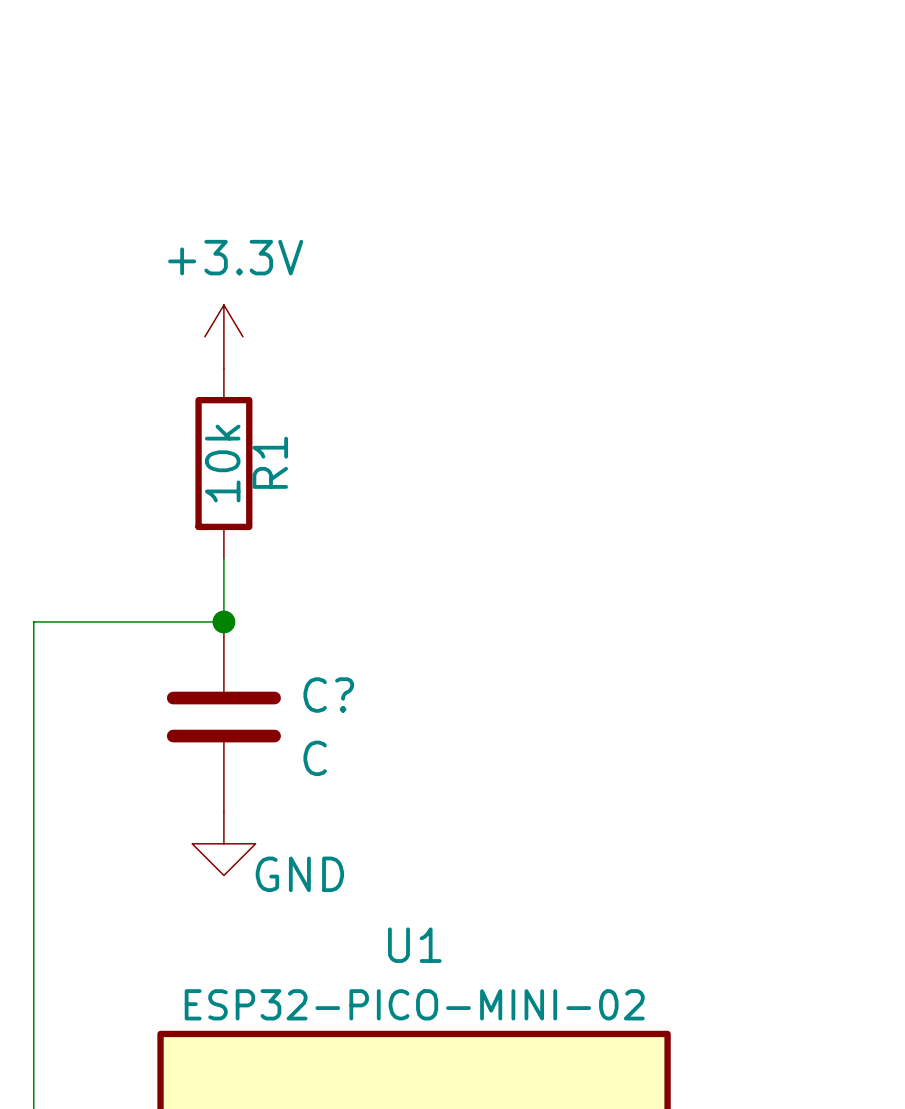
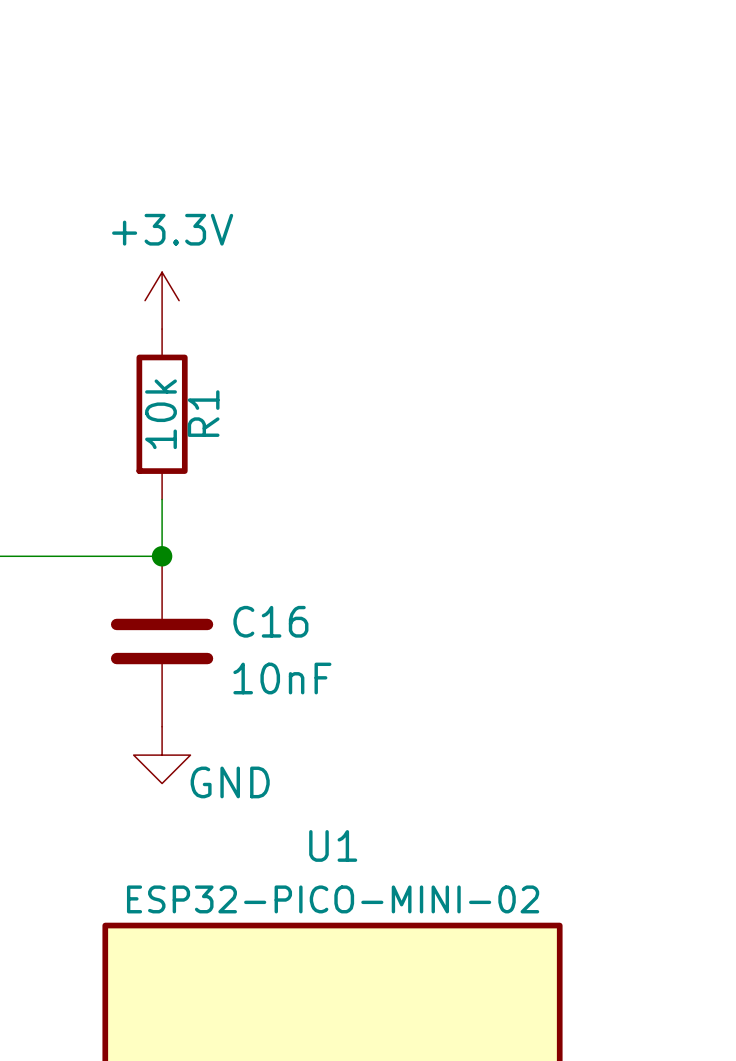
C? name: C? (328, 695) -> C16 (270, 621)
C? value: C (315, 758) -> 10nF (282, 678)

